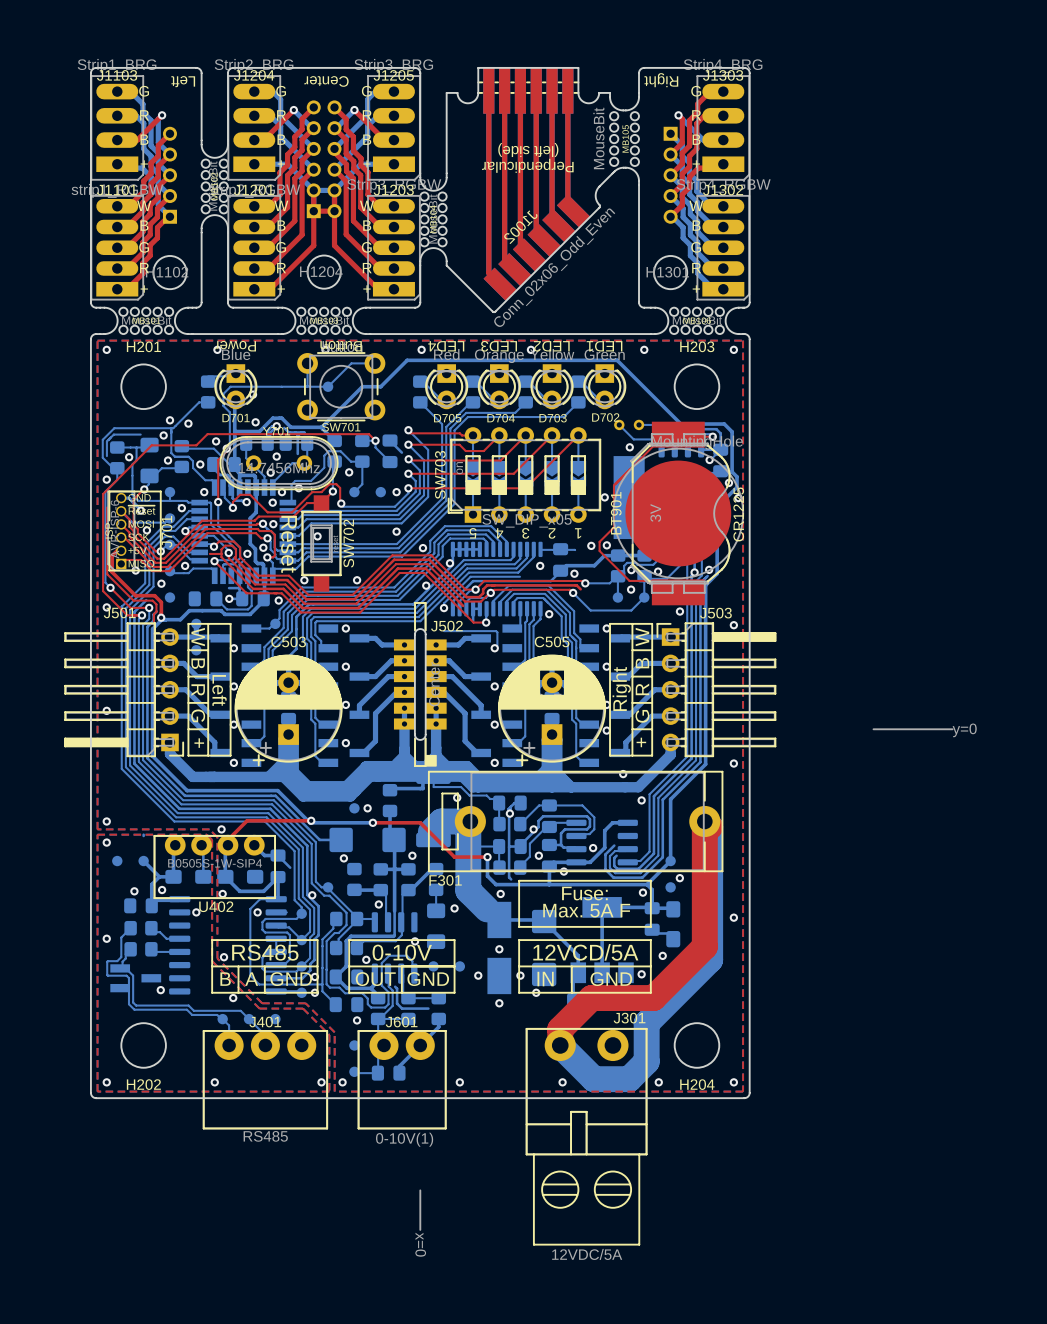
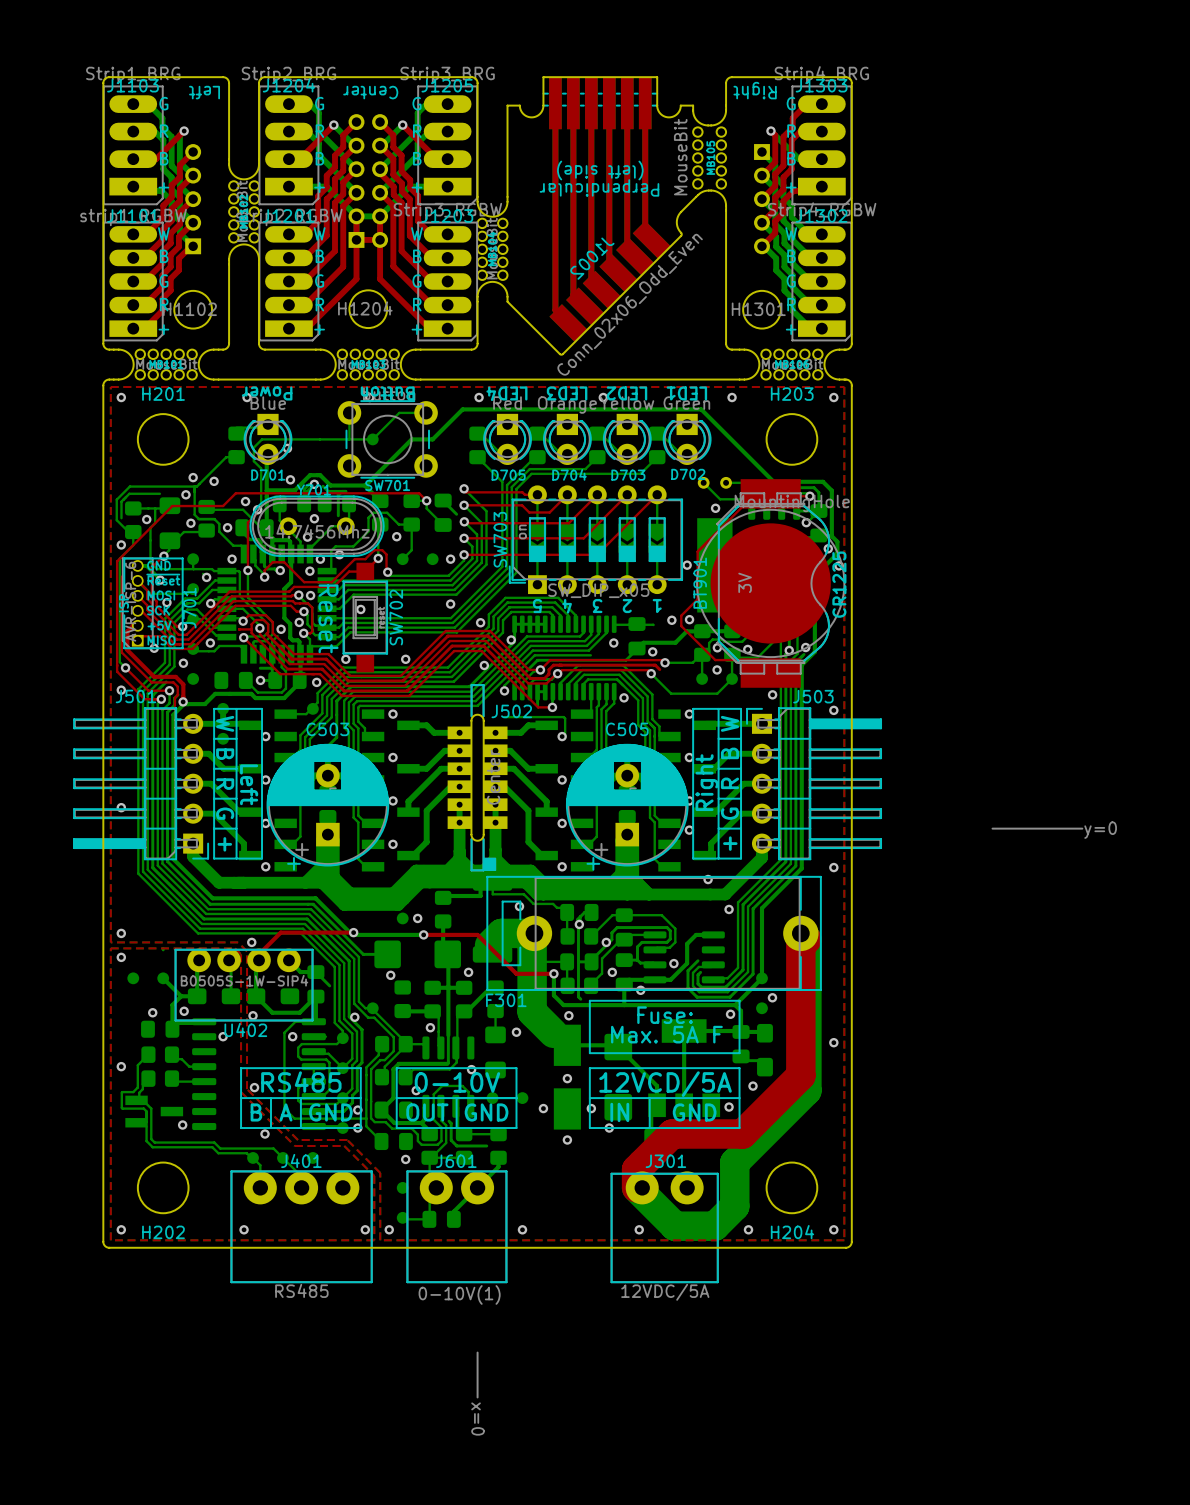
J301 name position: J301 (629, 1018) -> J301 (665, 1161)
J301 footprint: [526, 1028, 648, 1246] -> [610, 1171, 719, 1283]
J301 value position: 12VDC/5A (587, 1254) -> 12VDC/5A (665, 1292)

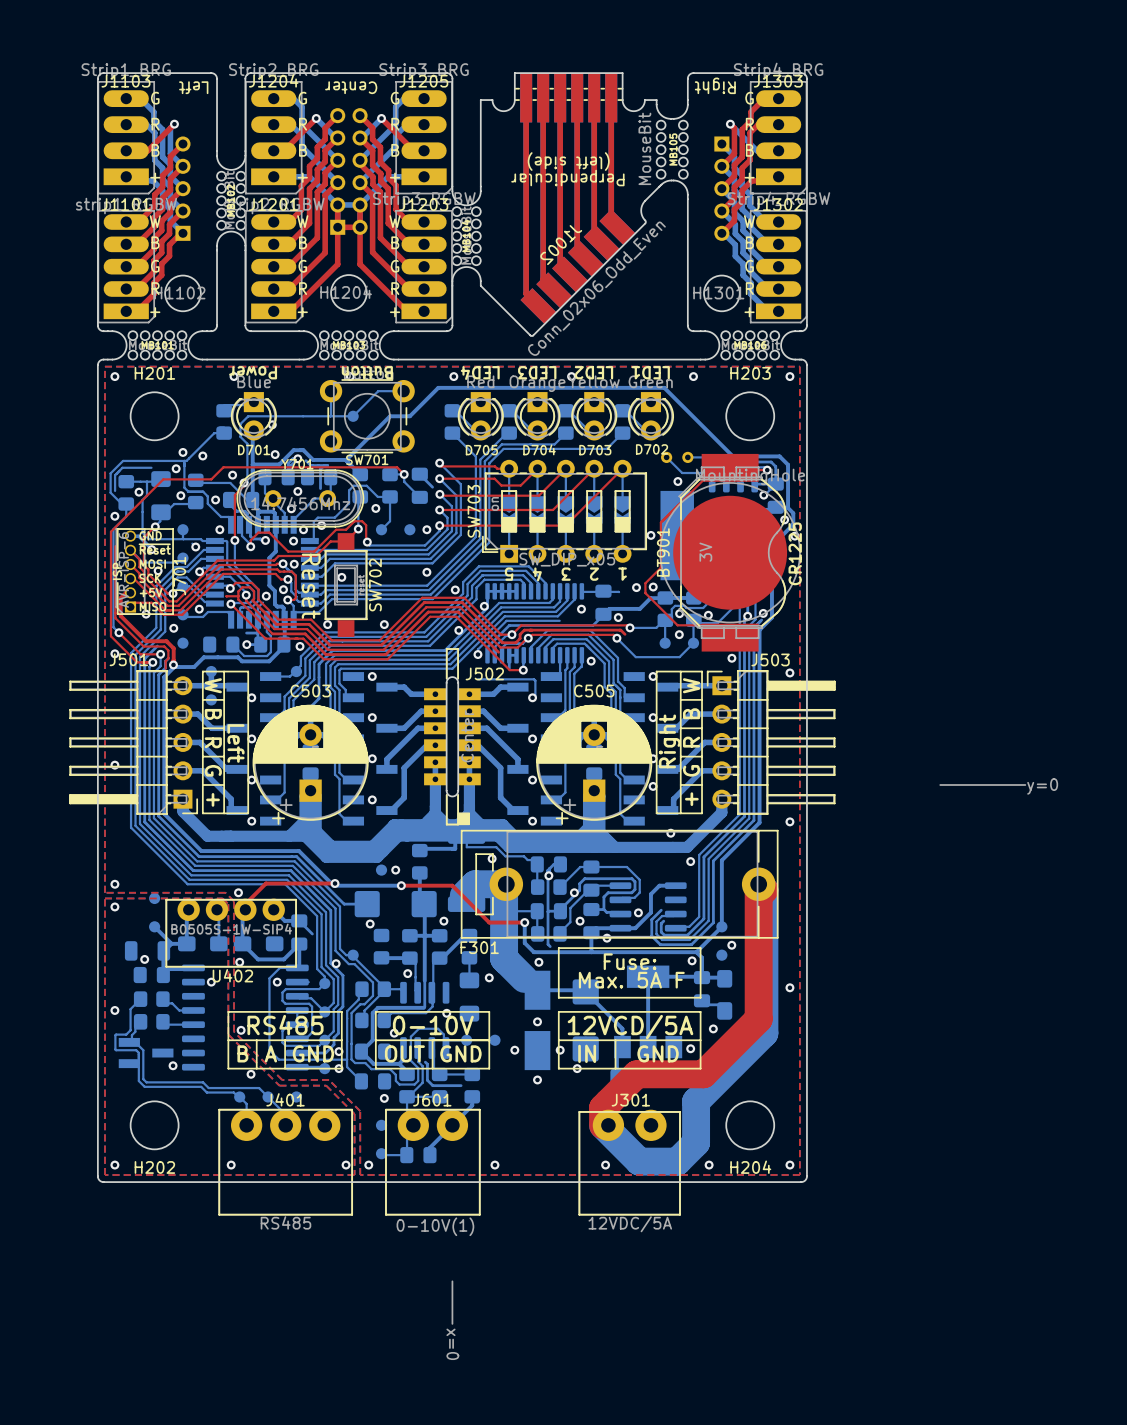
part position: (133, 978) -> (154, 898)
part: none -> (147, 950)
via: (184, 1011) -> none

